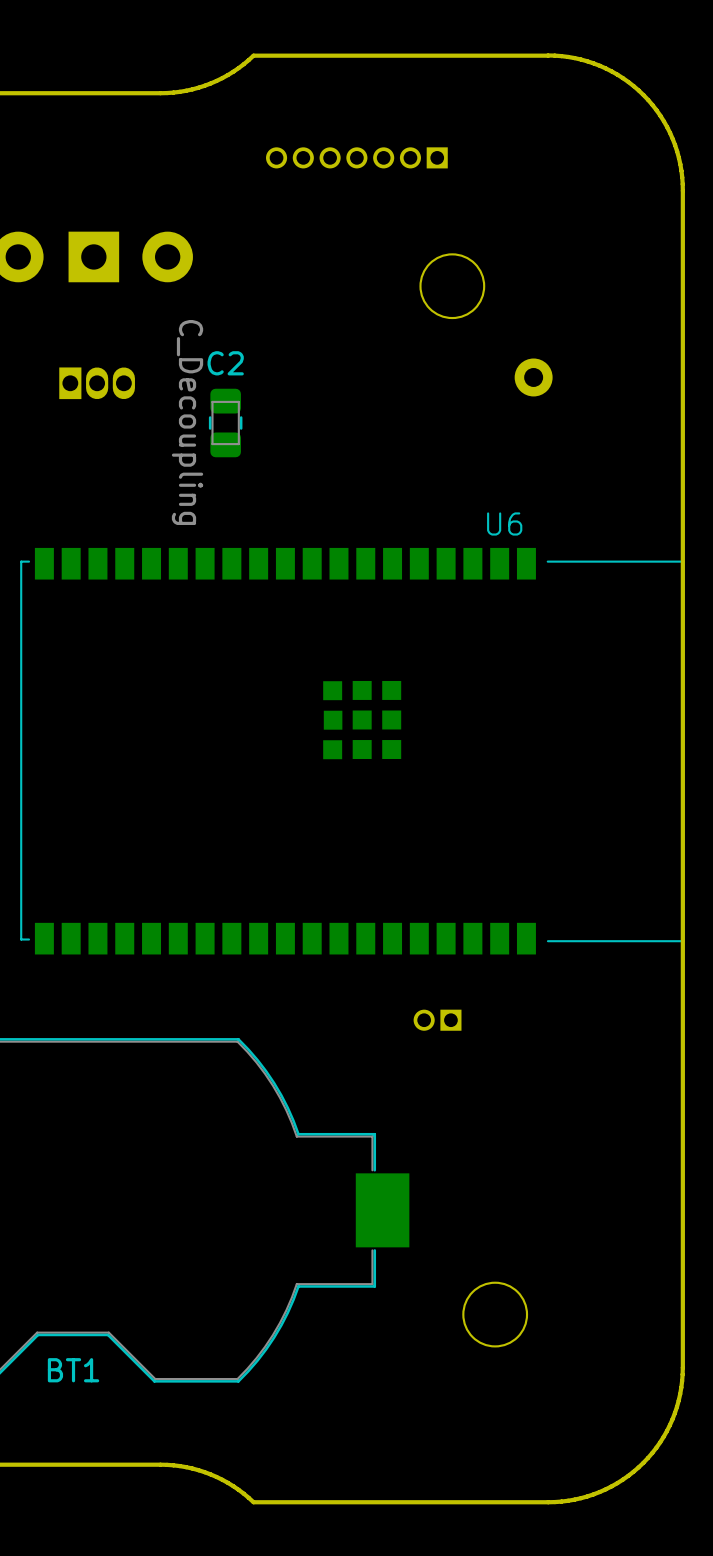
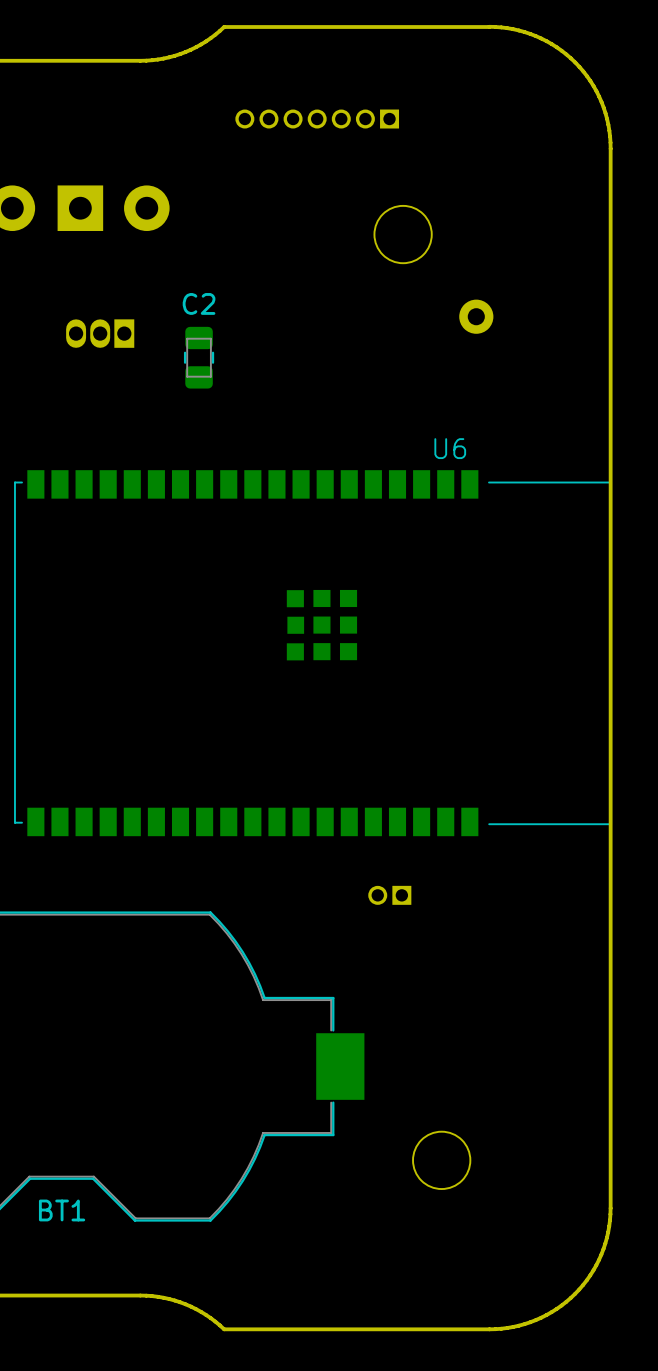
part rotation: 0° (97, 383) -> 180° (100, 333)
C2 value: C_Decoupling (187, 422) -> none

